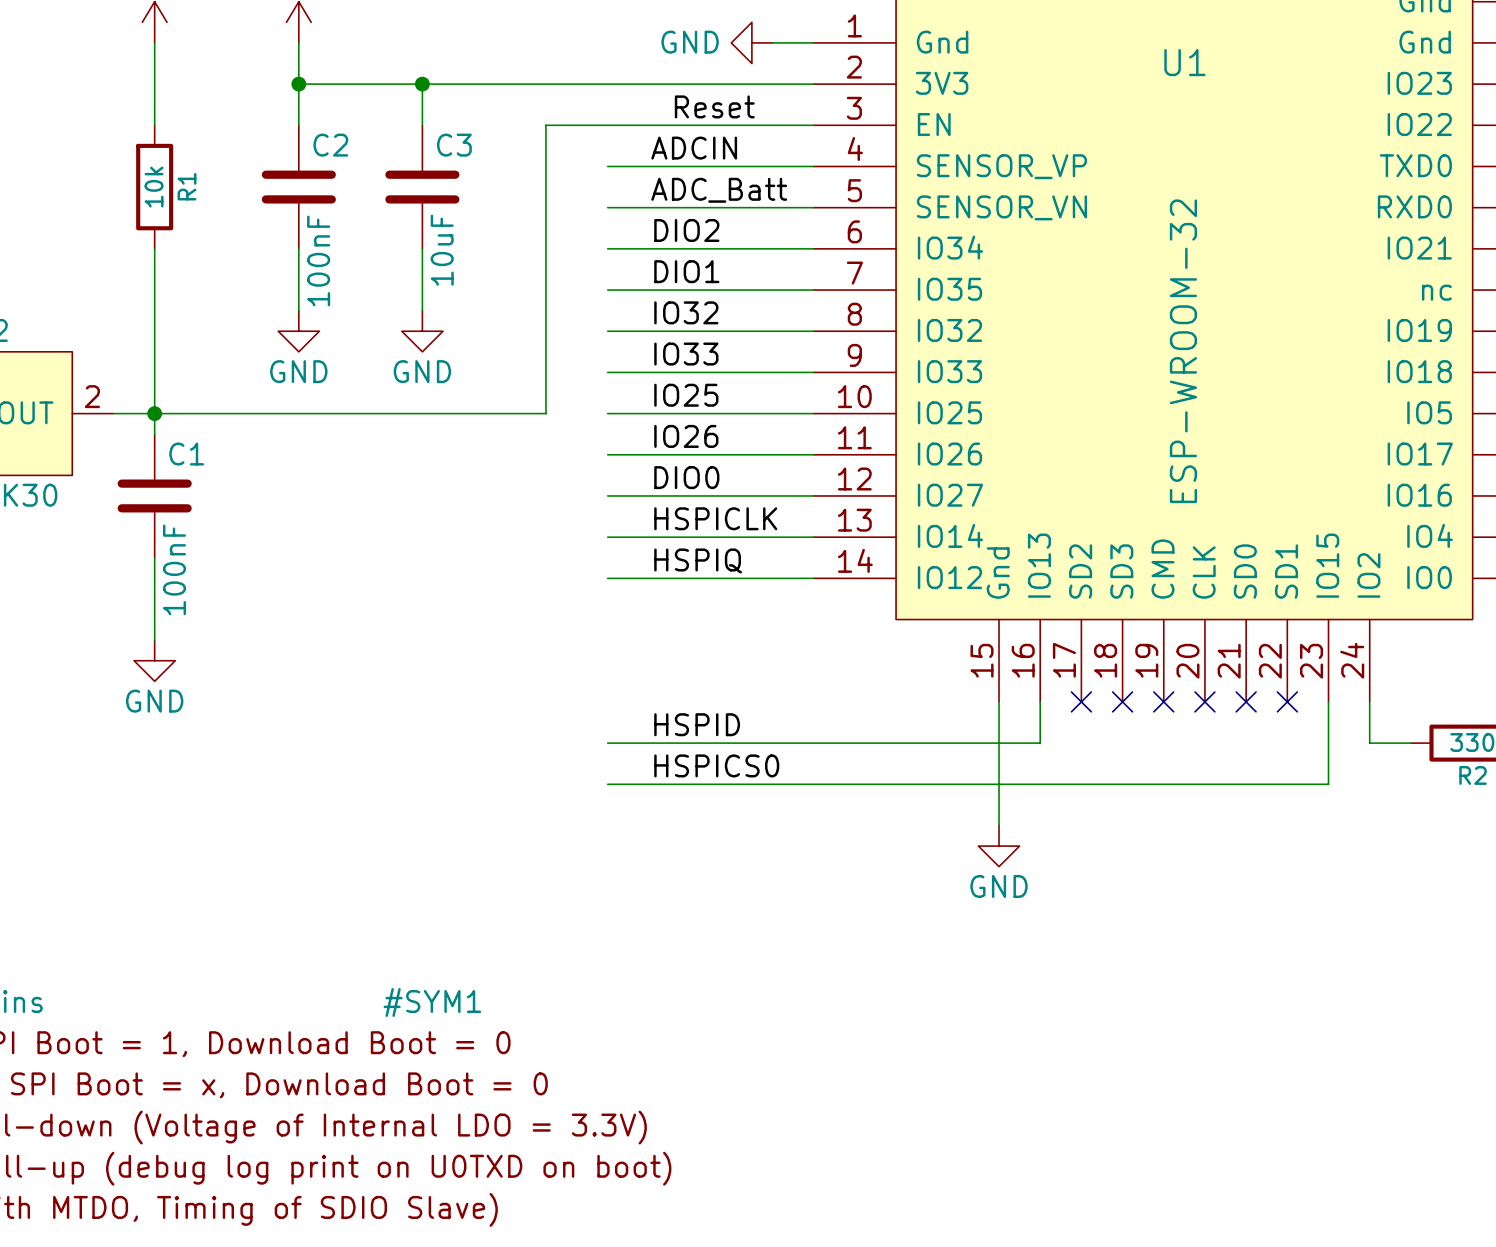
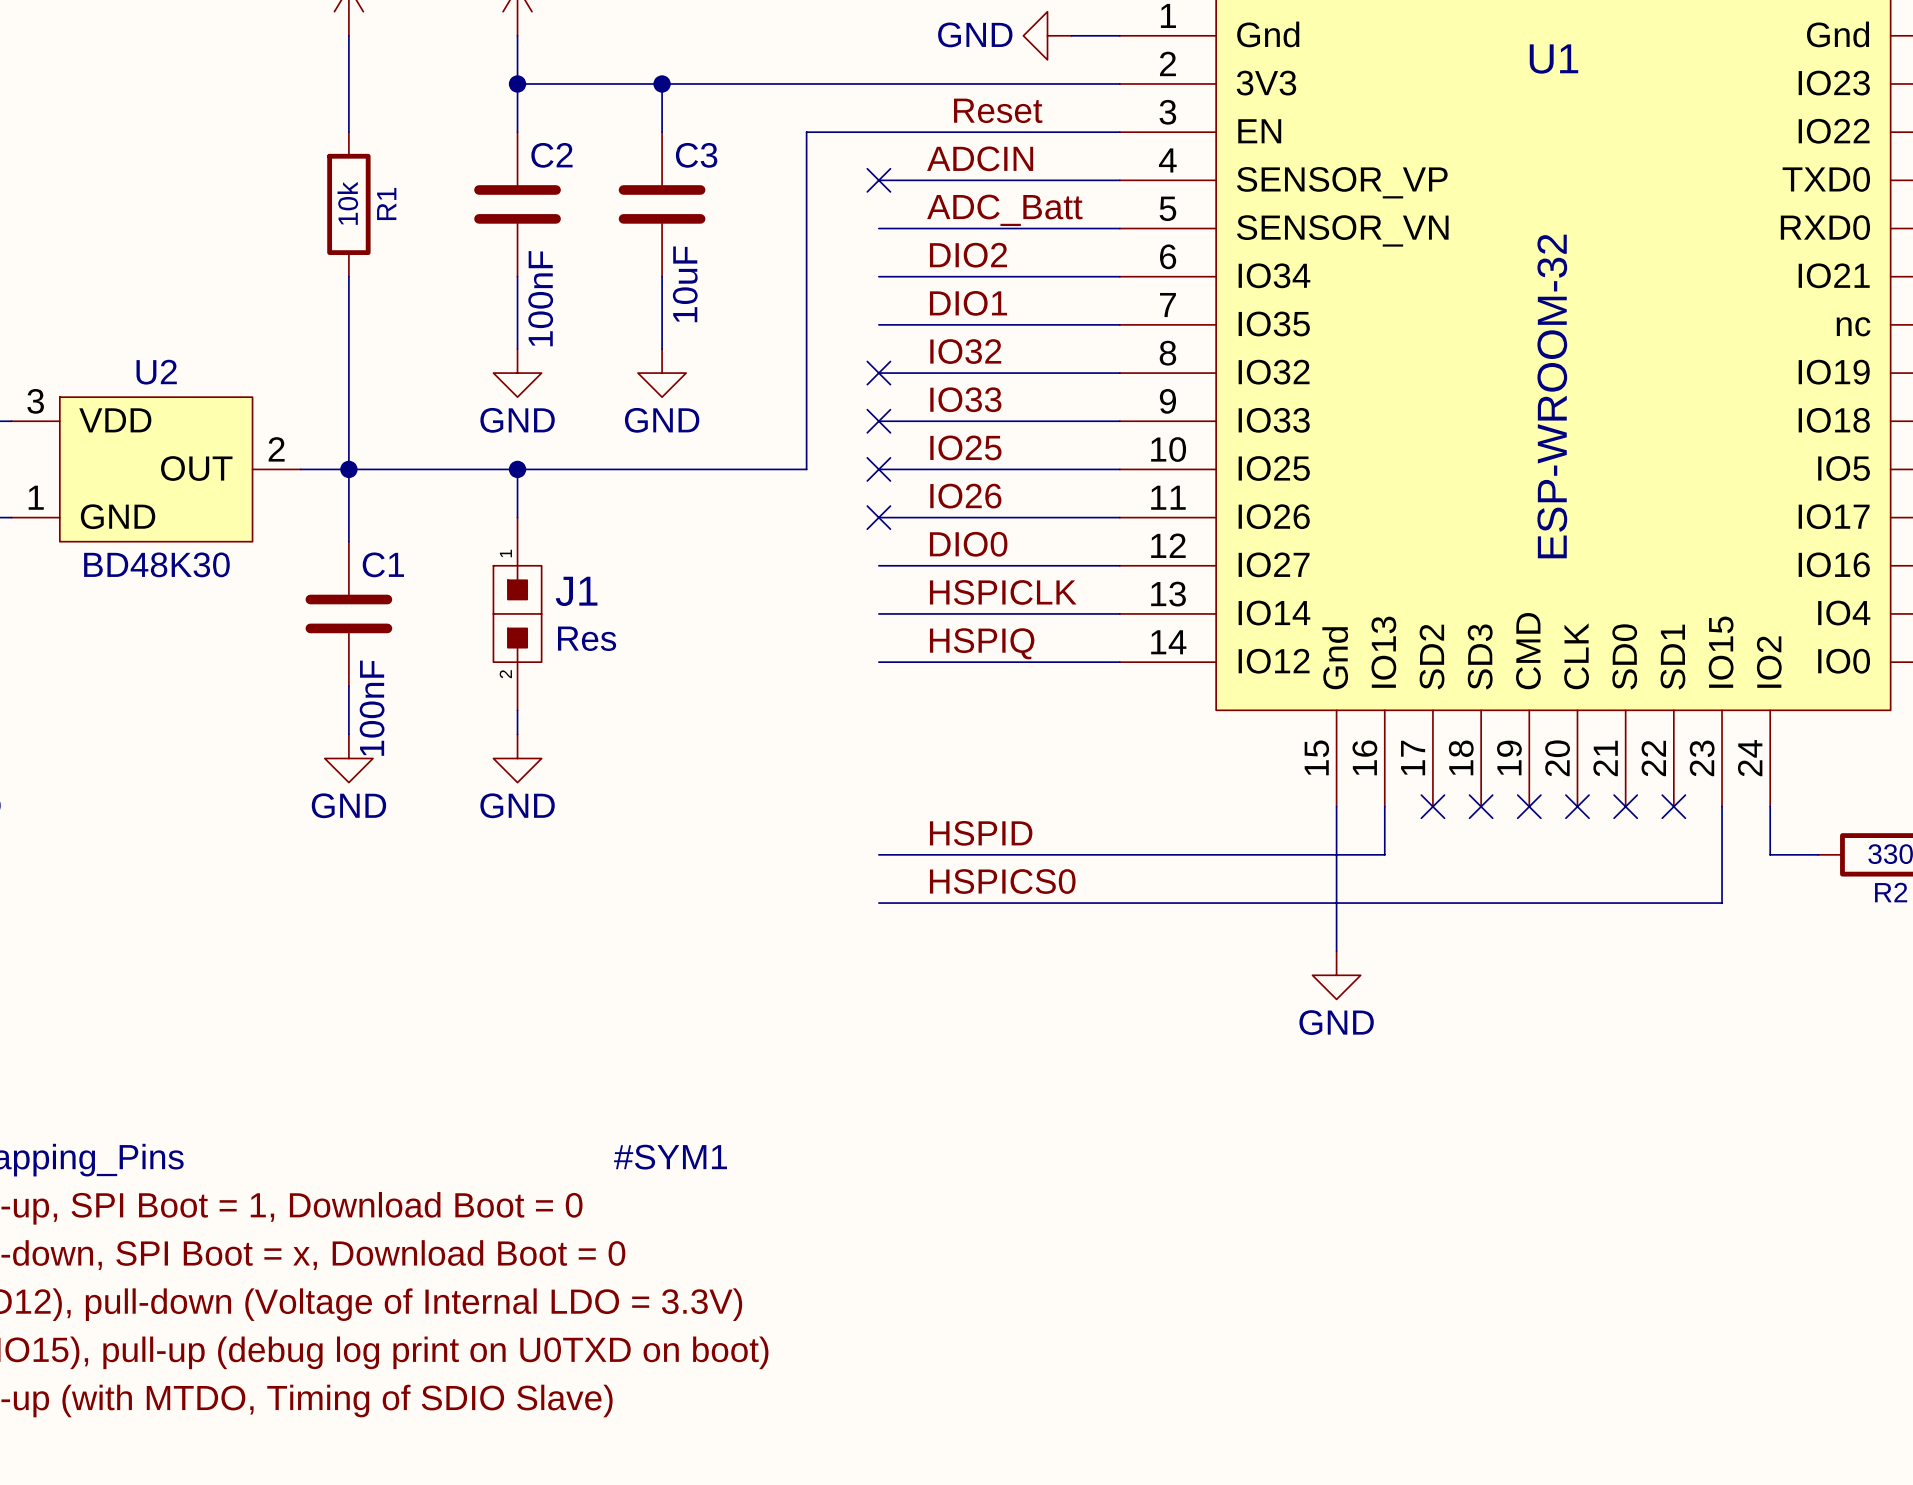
no-connect mark: none -> (878, 180)
no-connect mark: none -> (878, 373)
no-connect mark: none -> (878, 421)
wire: none -> (517, 469) (517, 517)
junction: none -> (517, 469)
no-connect mark: none -> (878, 469)
no-connect mark: none -> (878, 517)
C1 position: (154, 495) -> (348, 613)
J1: none -> Res (517, 613)
wire: none -> (517, 710) (517, 734)
power symbol: none -> GND (517, 758)

